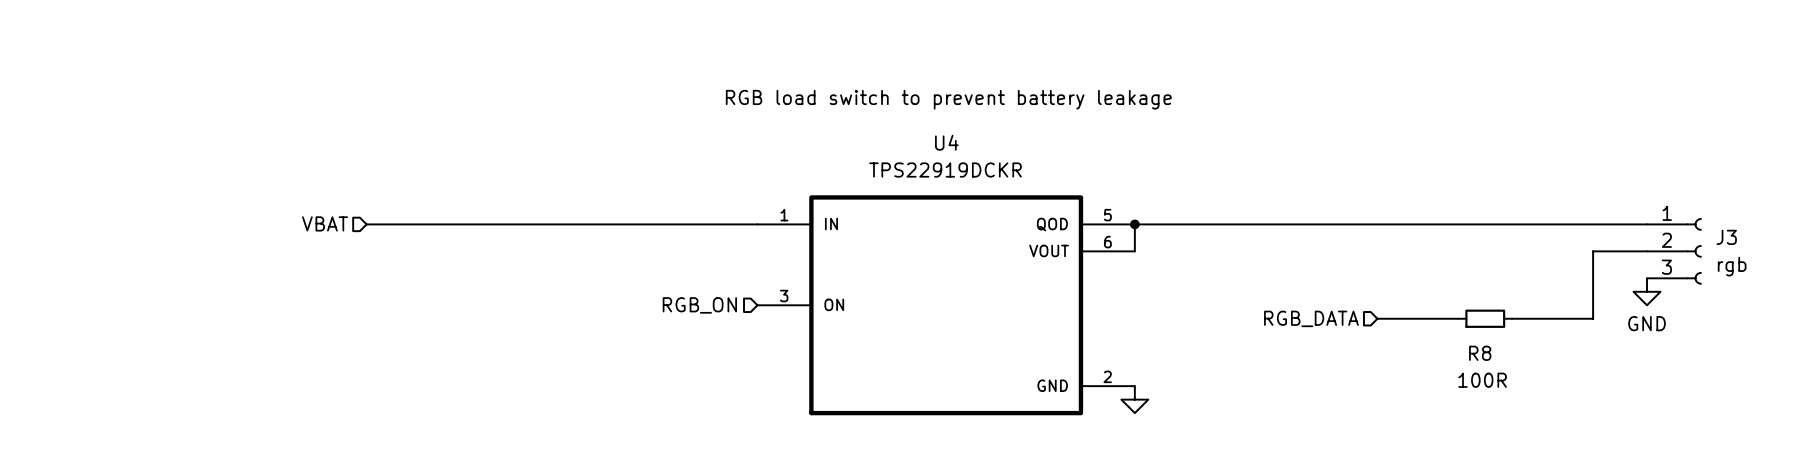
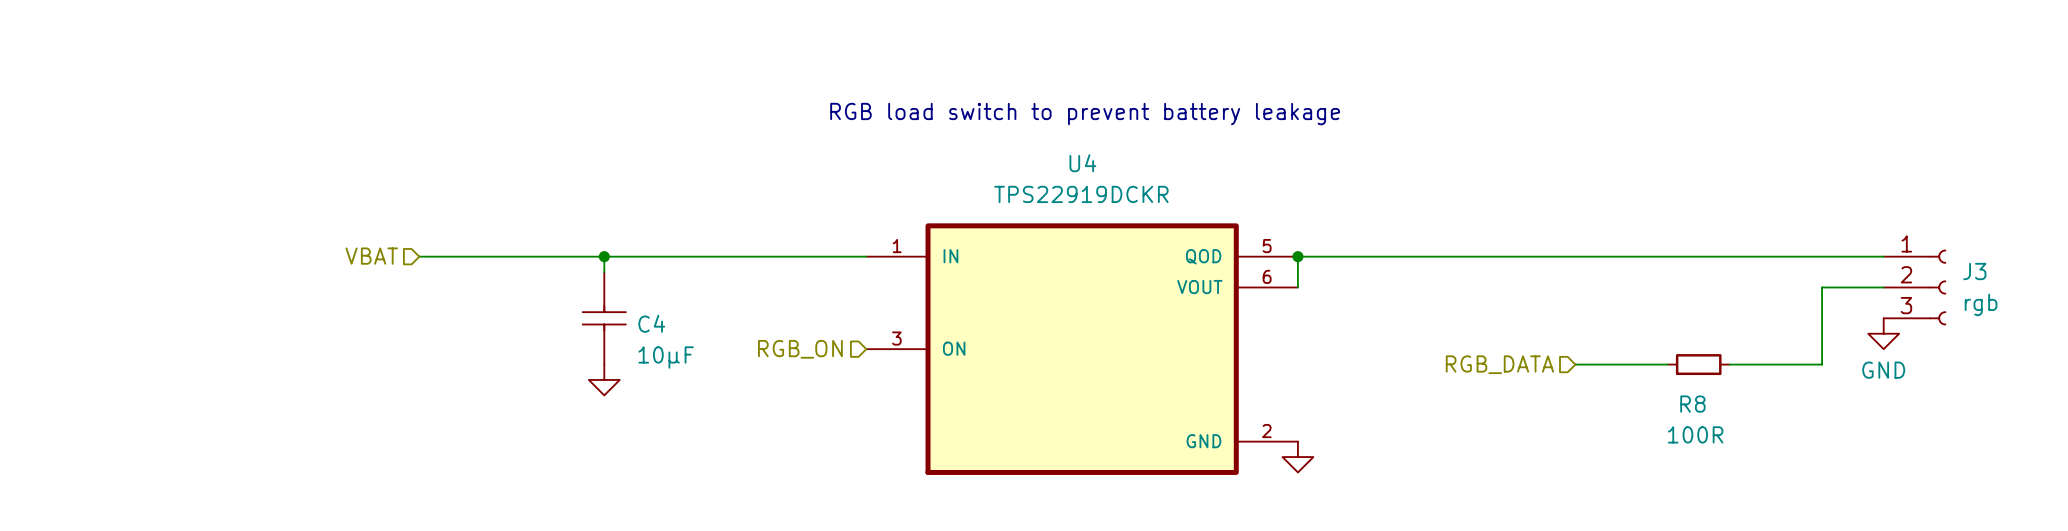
wire: none -> (604, 256) (604, 272)
junction: none -> (604, 256)
C4: none -> 10µF (604, 318)
power symbol: none -> (604, 379)

